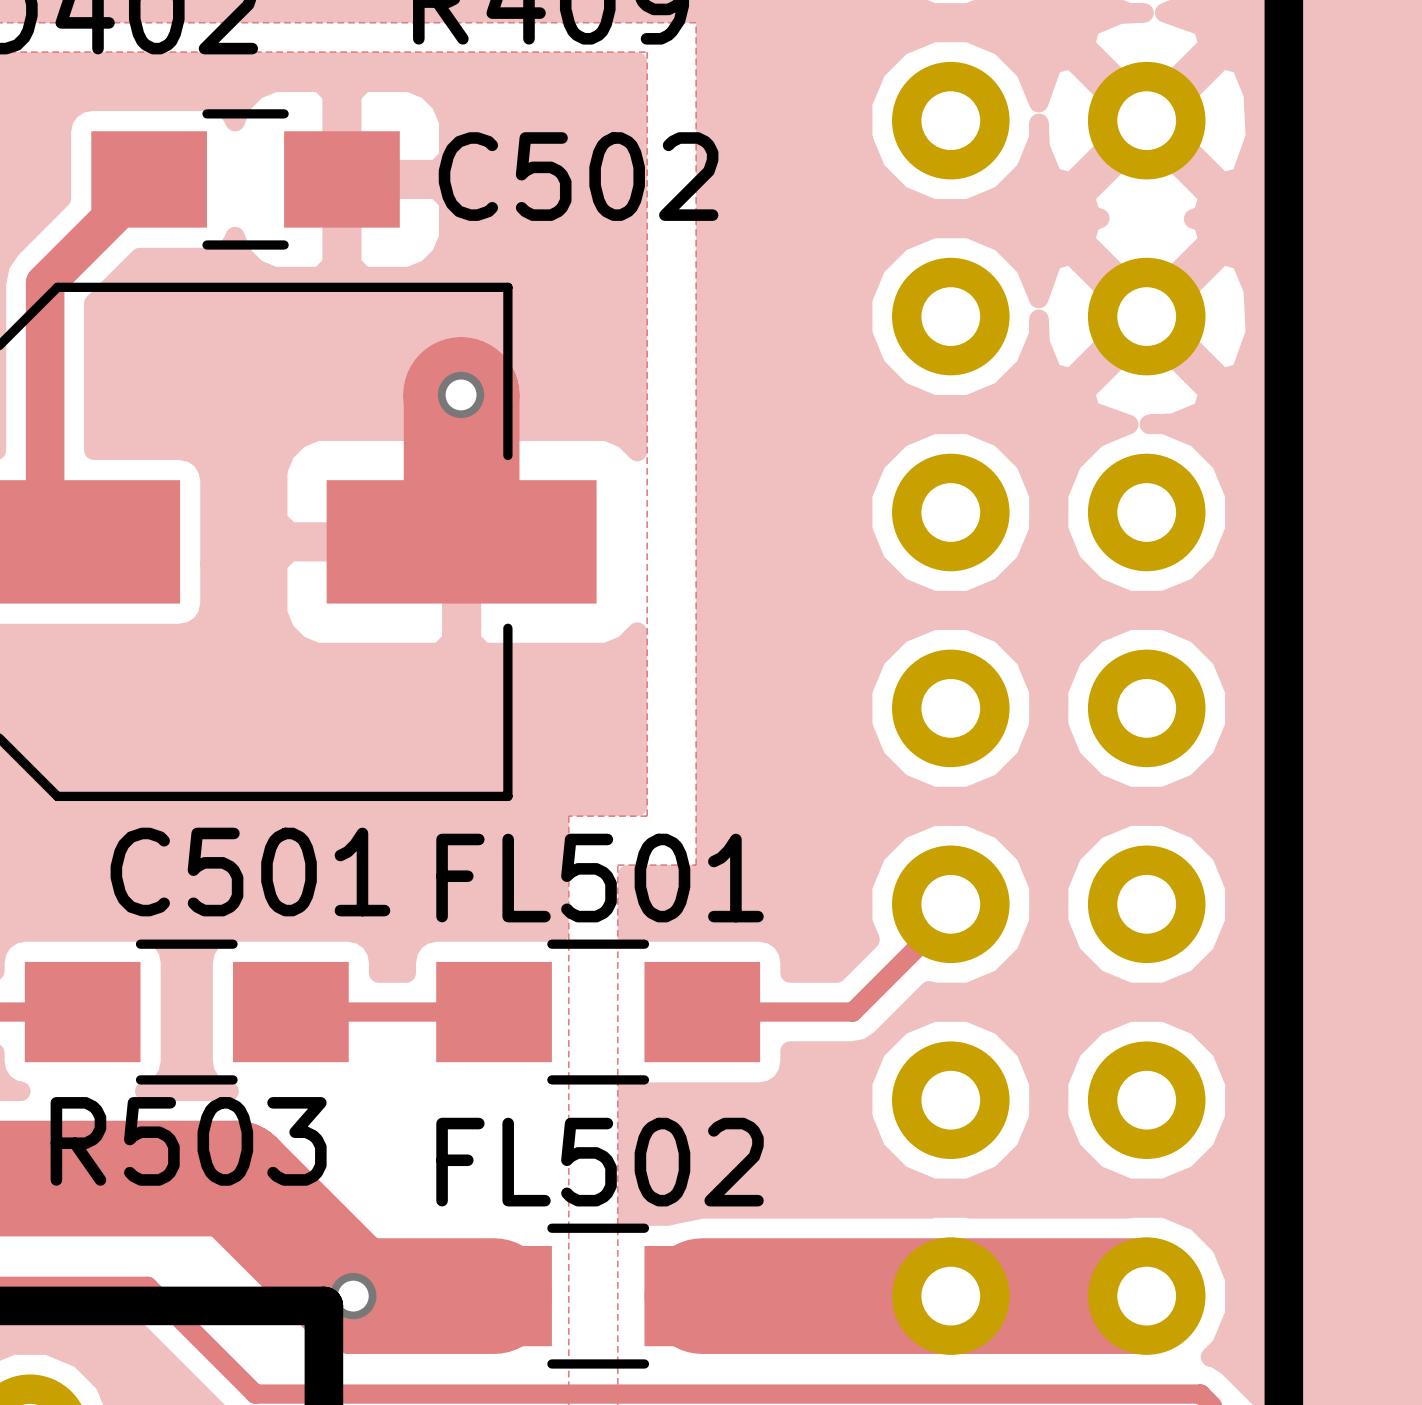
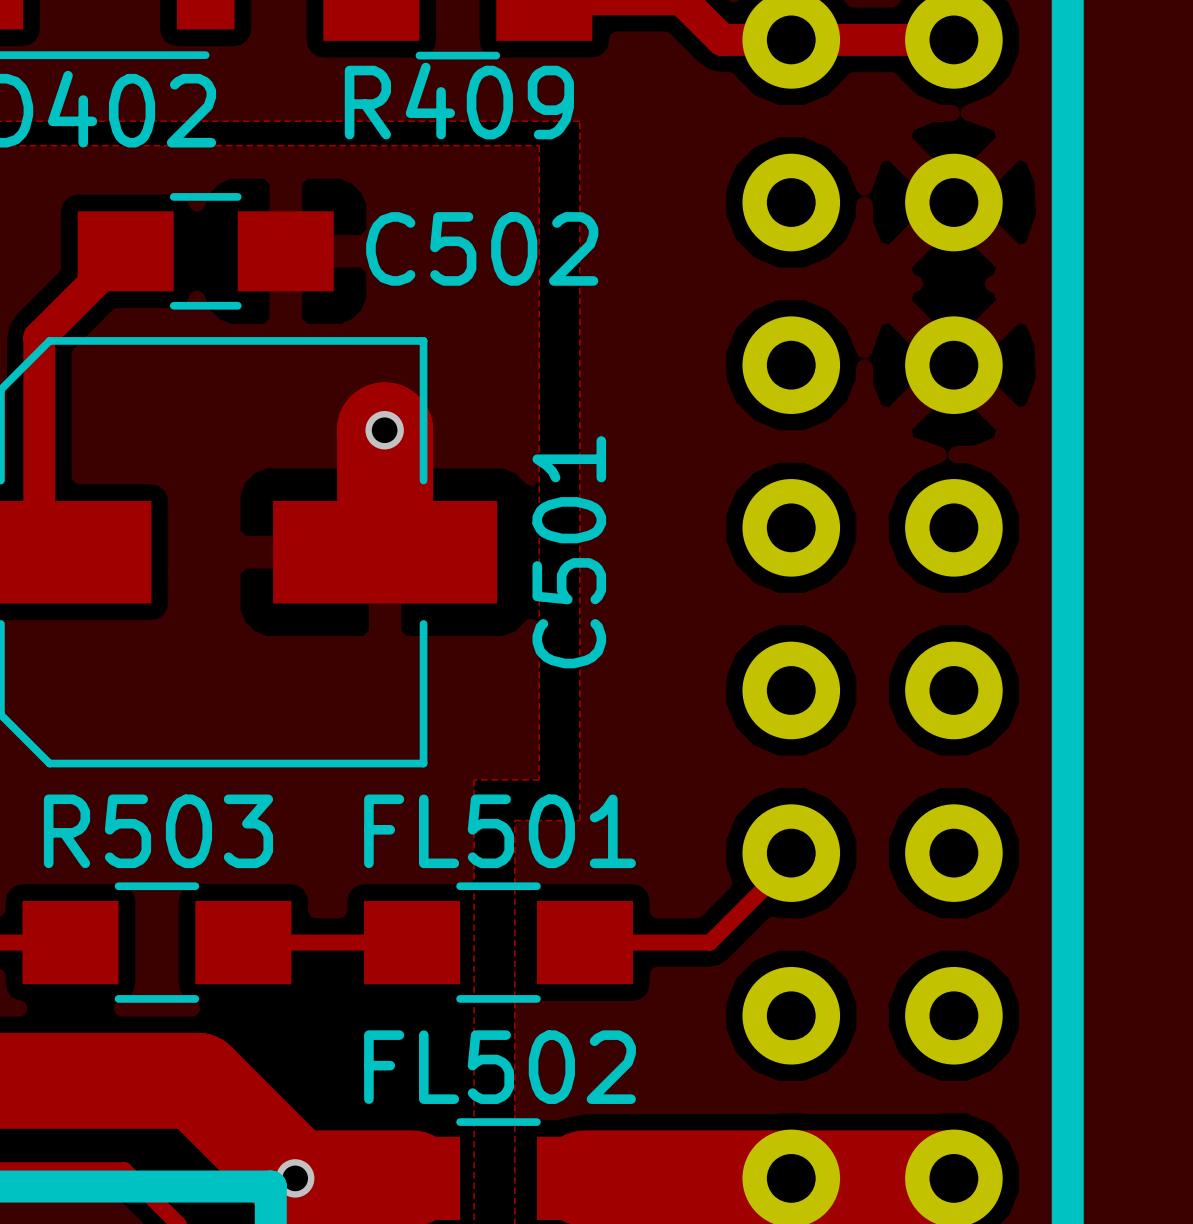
C501 name rotation: 0° (250, 872) -> 90° counterclockwise (569, 552)
C501 name position: C501 (250, 872) -> C501 (569, 552)
R503 name position: R503 (188, 1141) -> R503 (158, 831)

